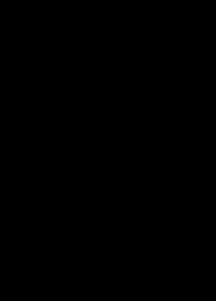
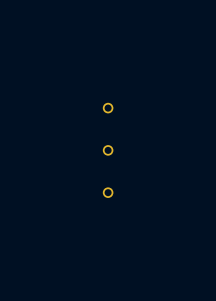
part: none -> (108, 150)

